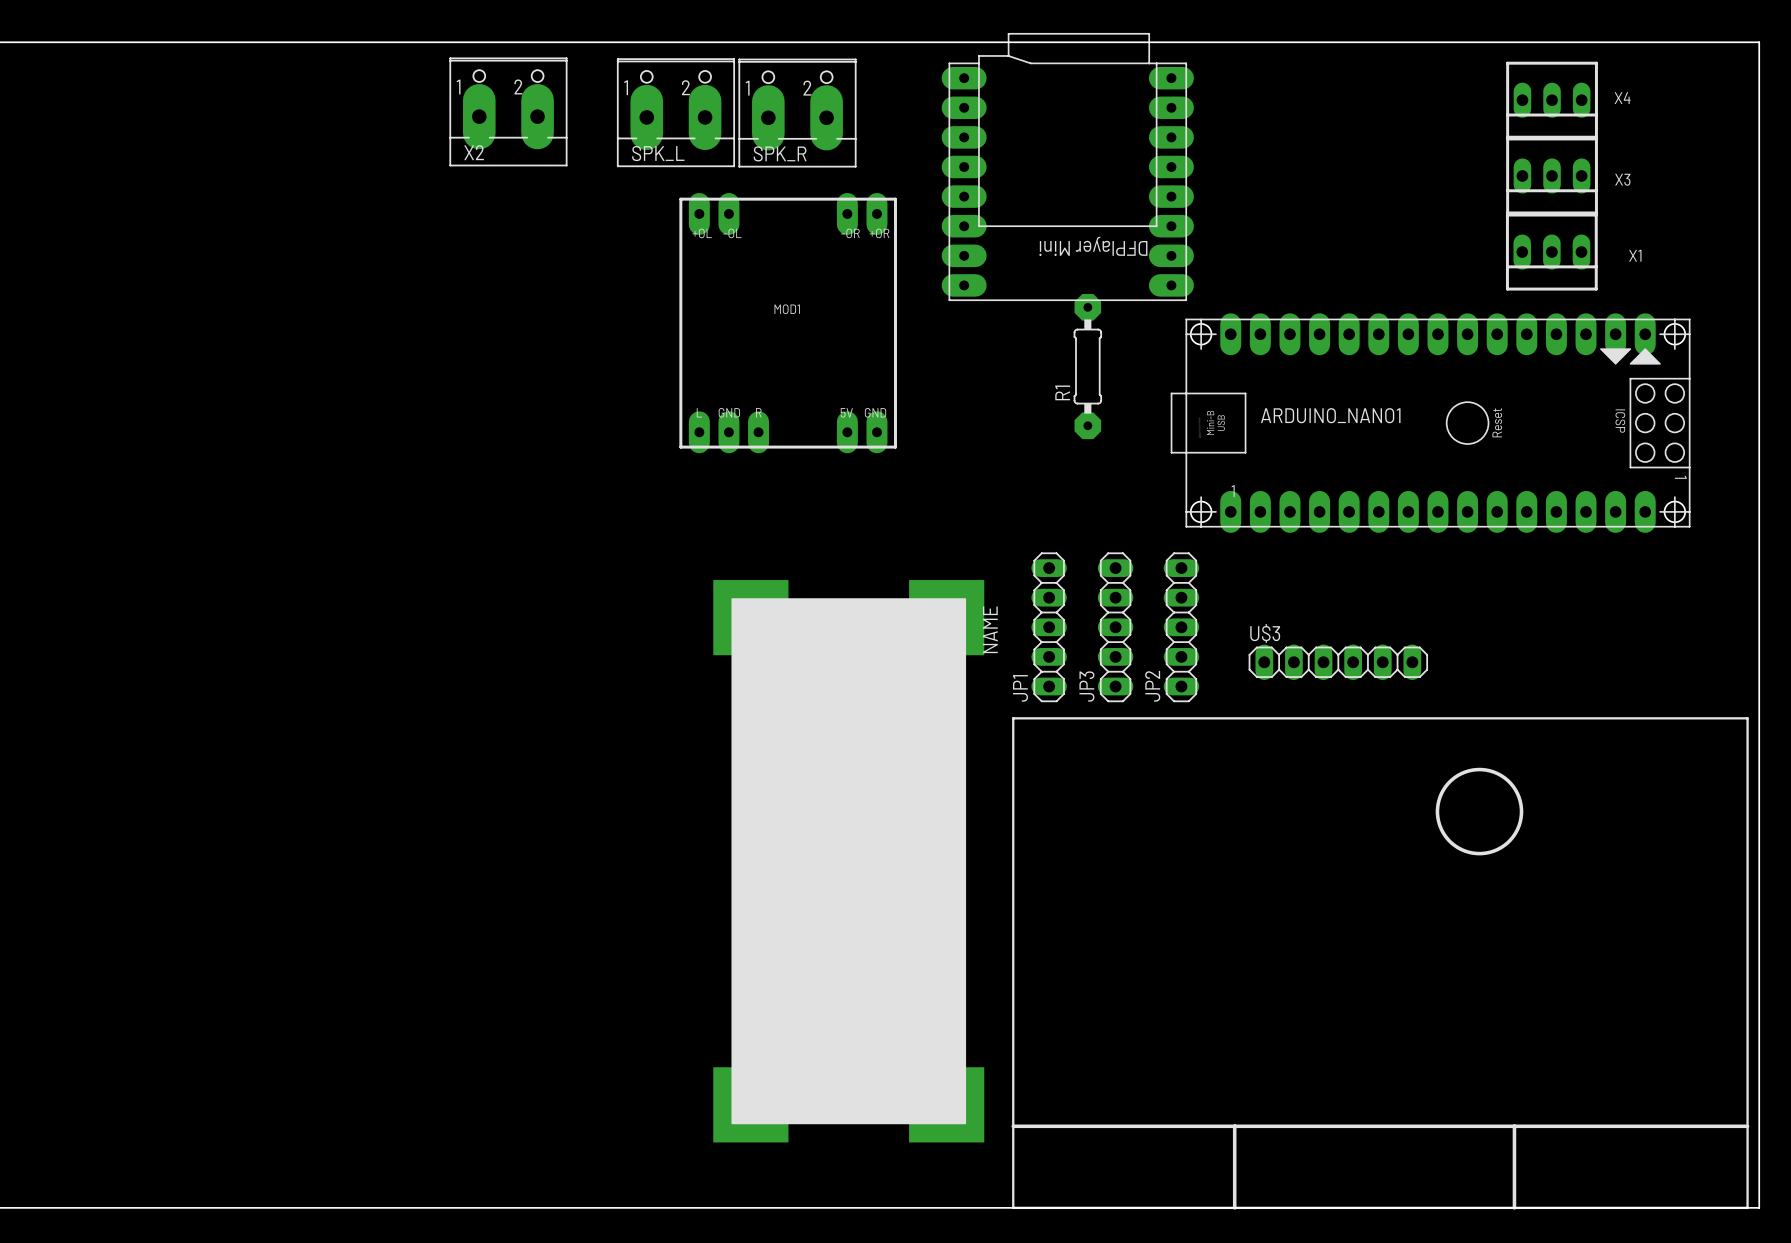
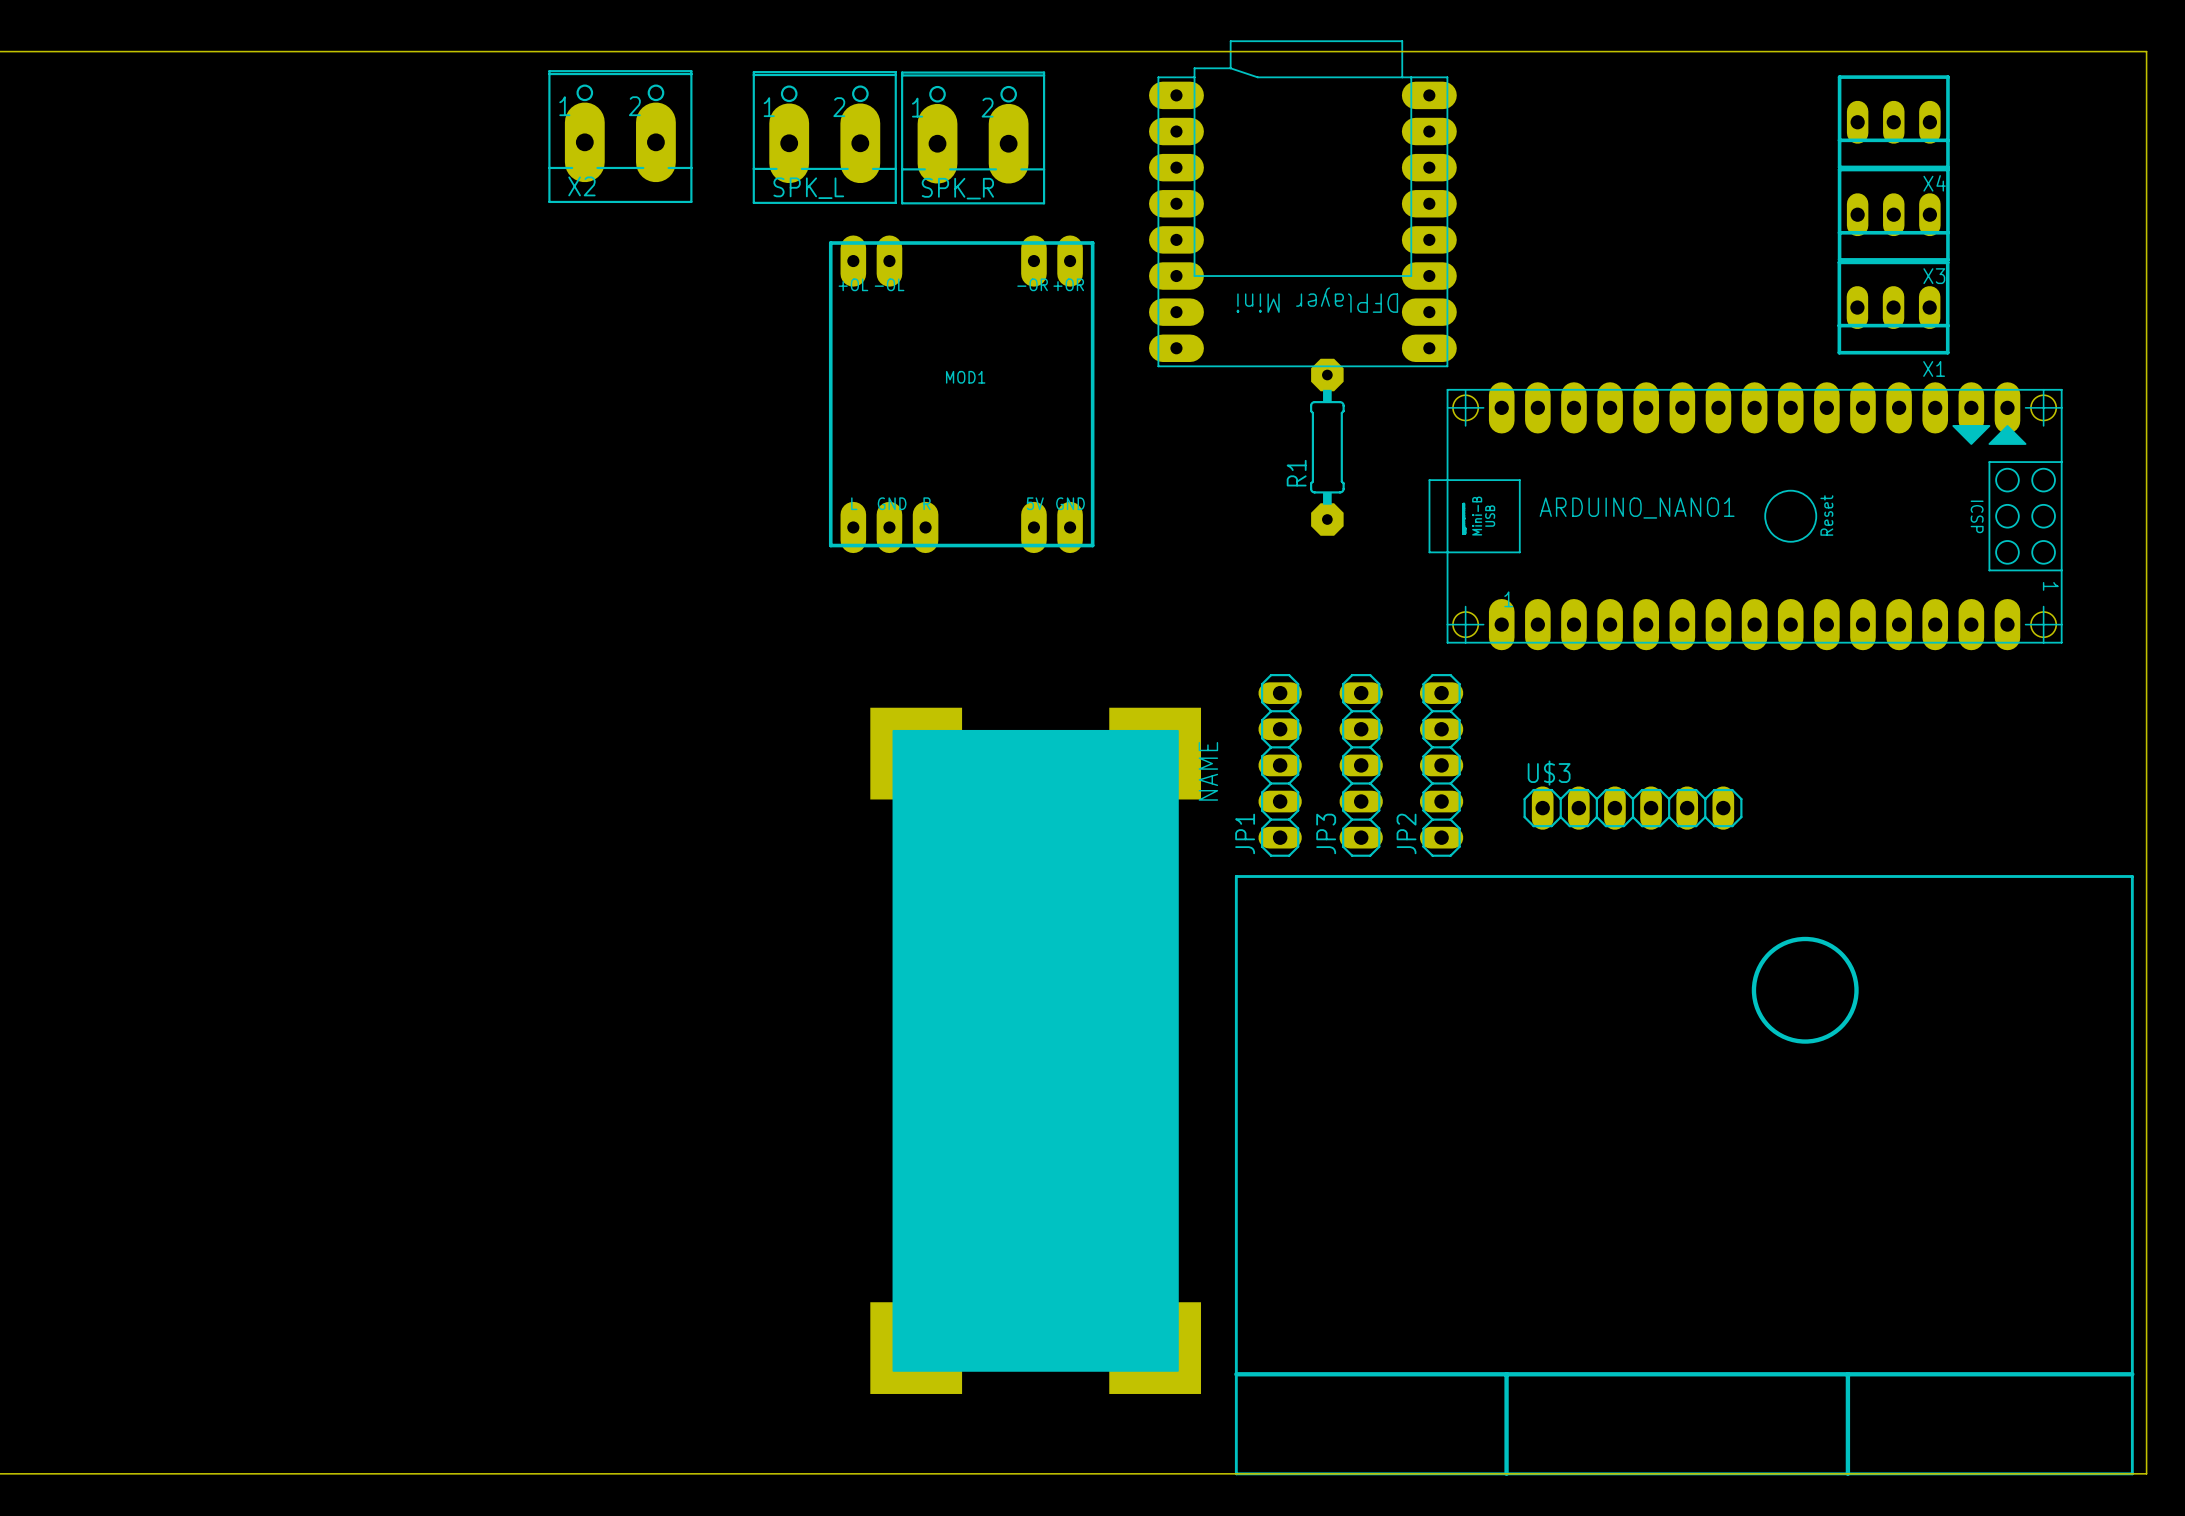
X4 name position: X4 (1622, 98) -> X4 (1934, 183)
X3 name position: X3 (1622, 179) -> X3 (1934, 276)
X1 name position: X1 (1635, 255) -> X1 (1934, 368)

